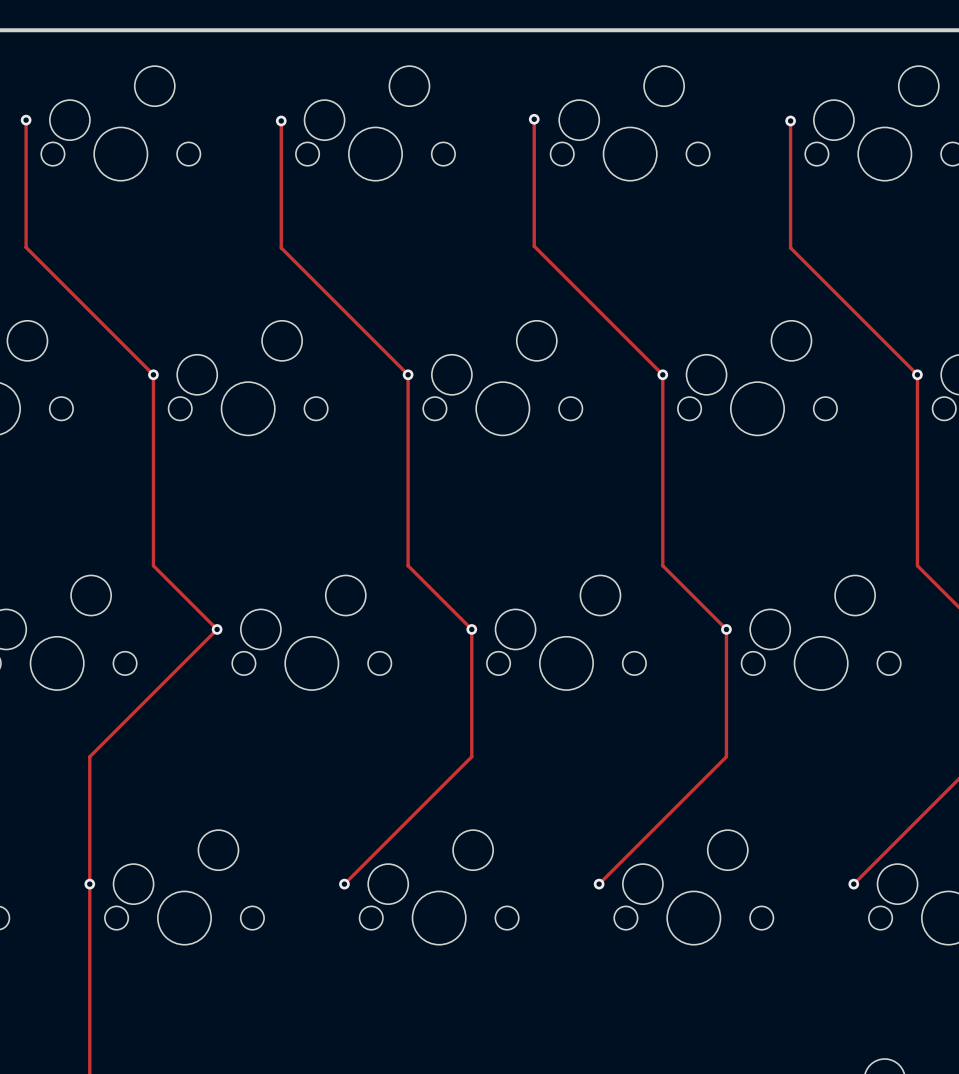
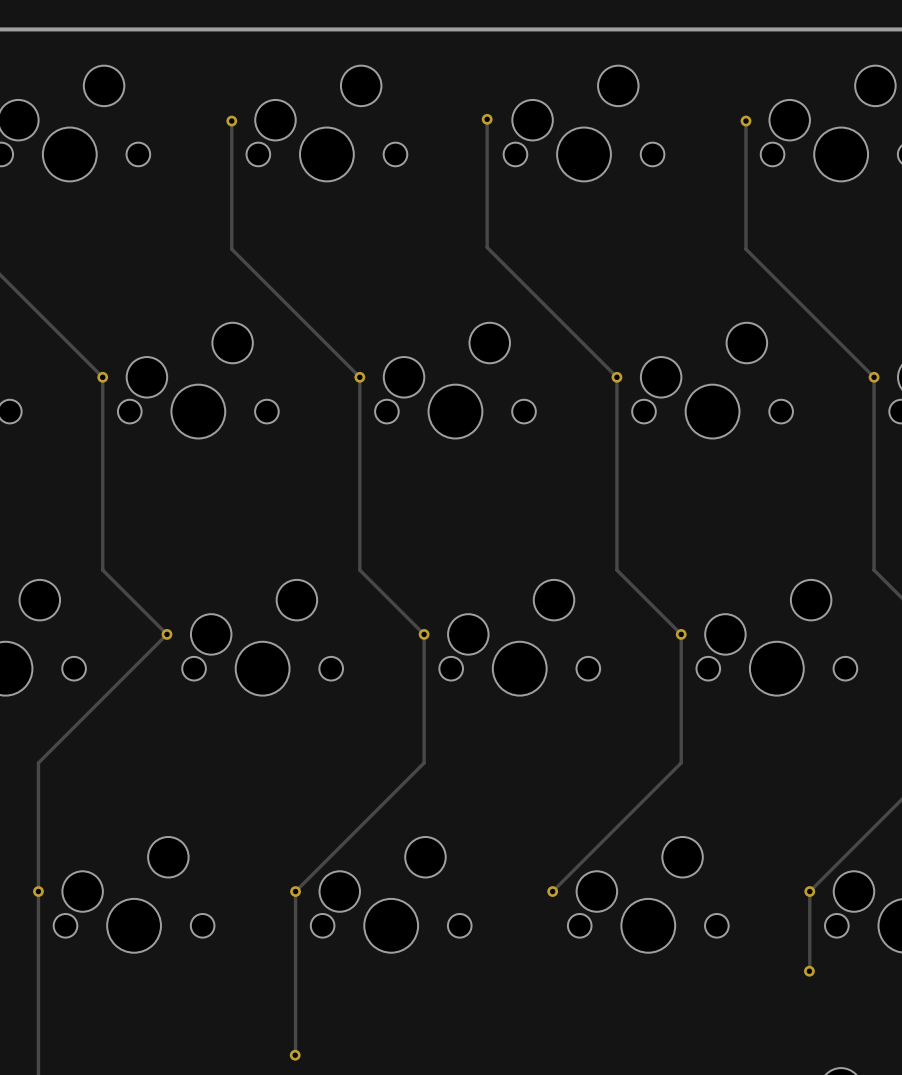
track: none -> (295, 891) (295, 1055)
track: none -> (809, 891) (809, 971)
via: none -> (809, 971)
via: none -> (295, 1055)

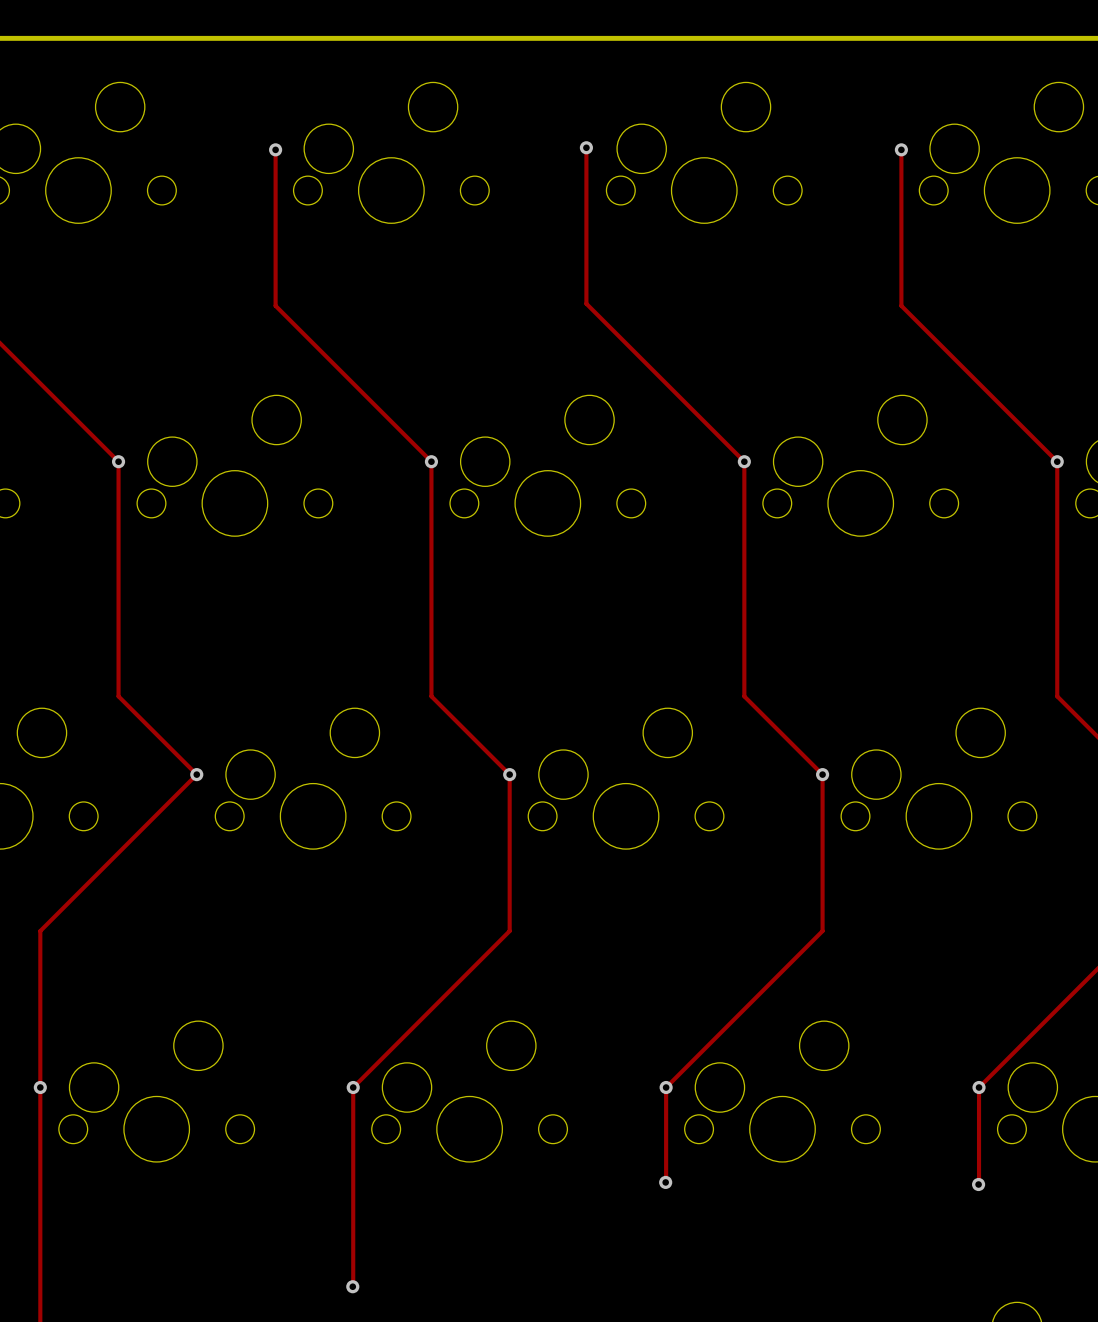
track: none -> (666, 1087) (665, 1182)
via: none -> (665, 1182)

